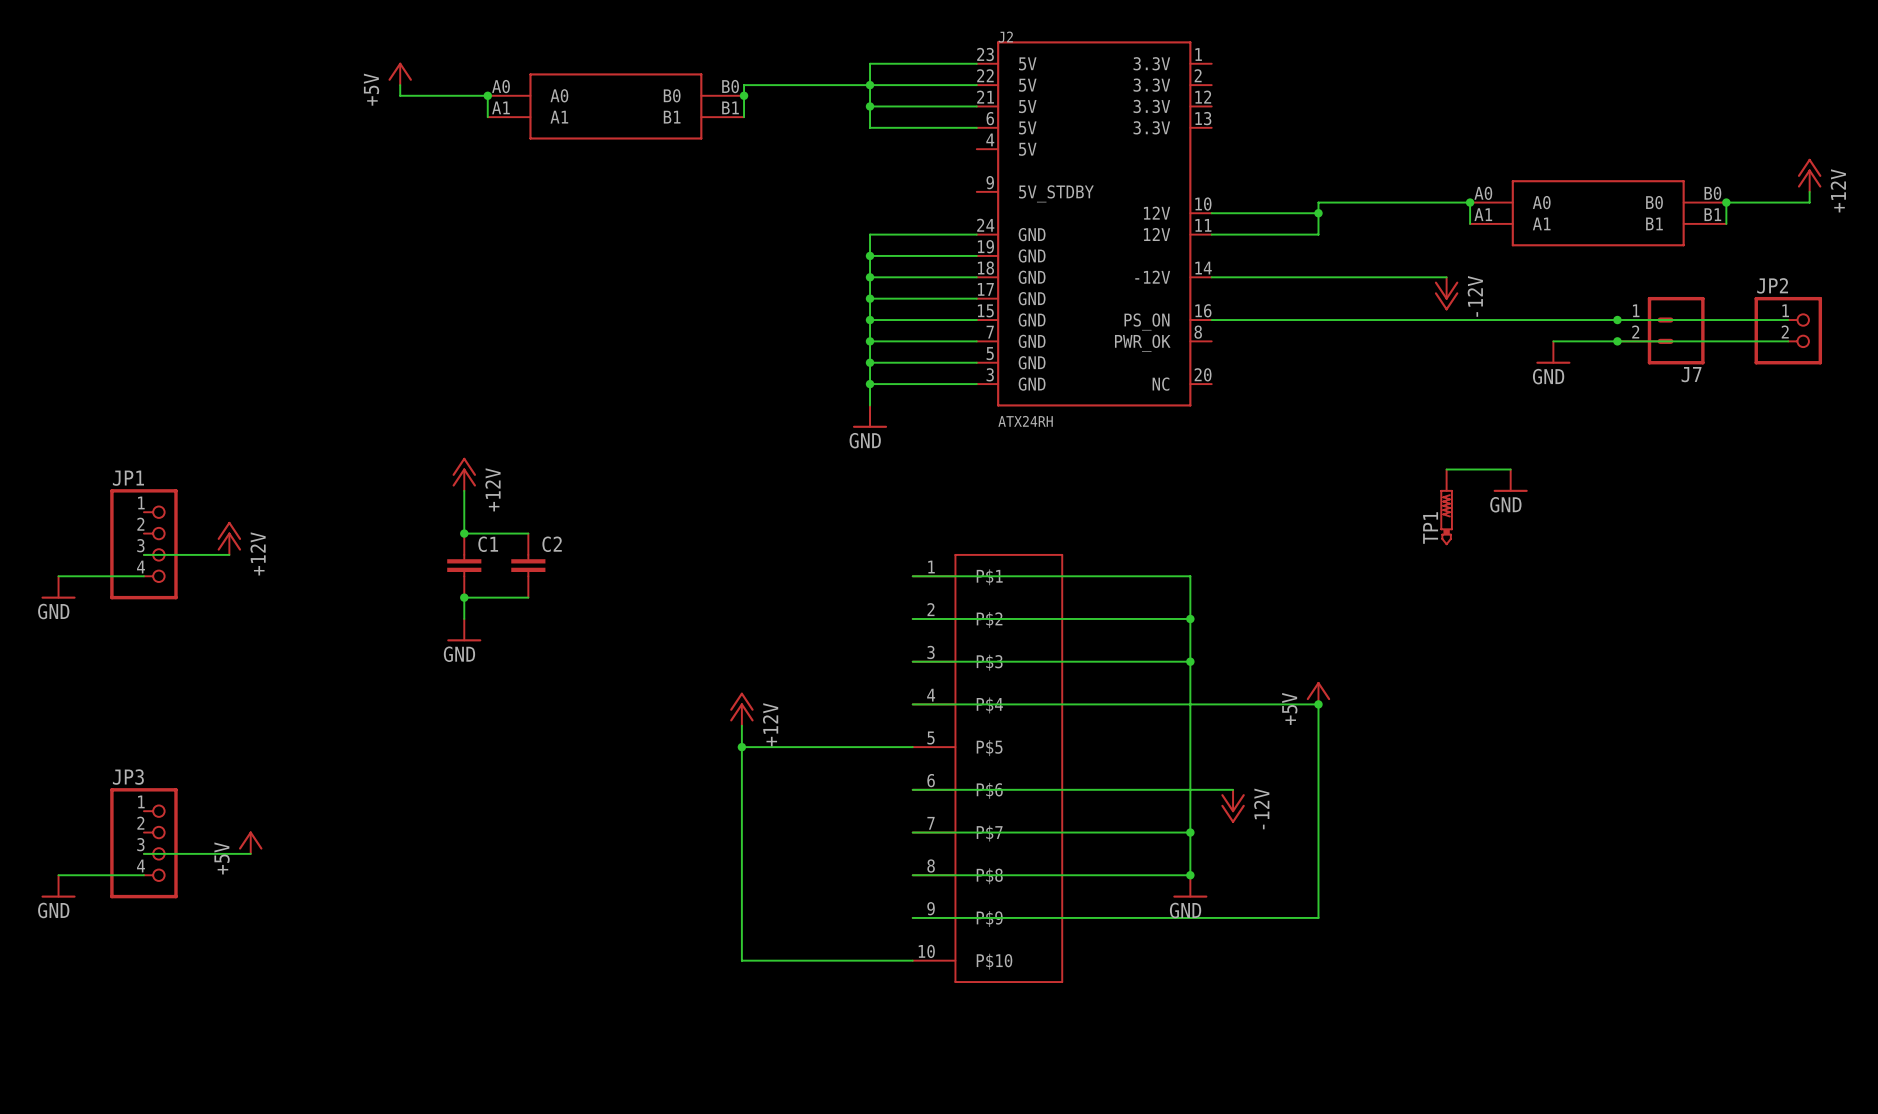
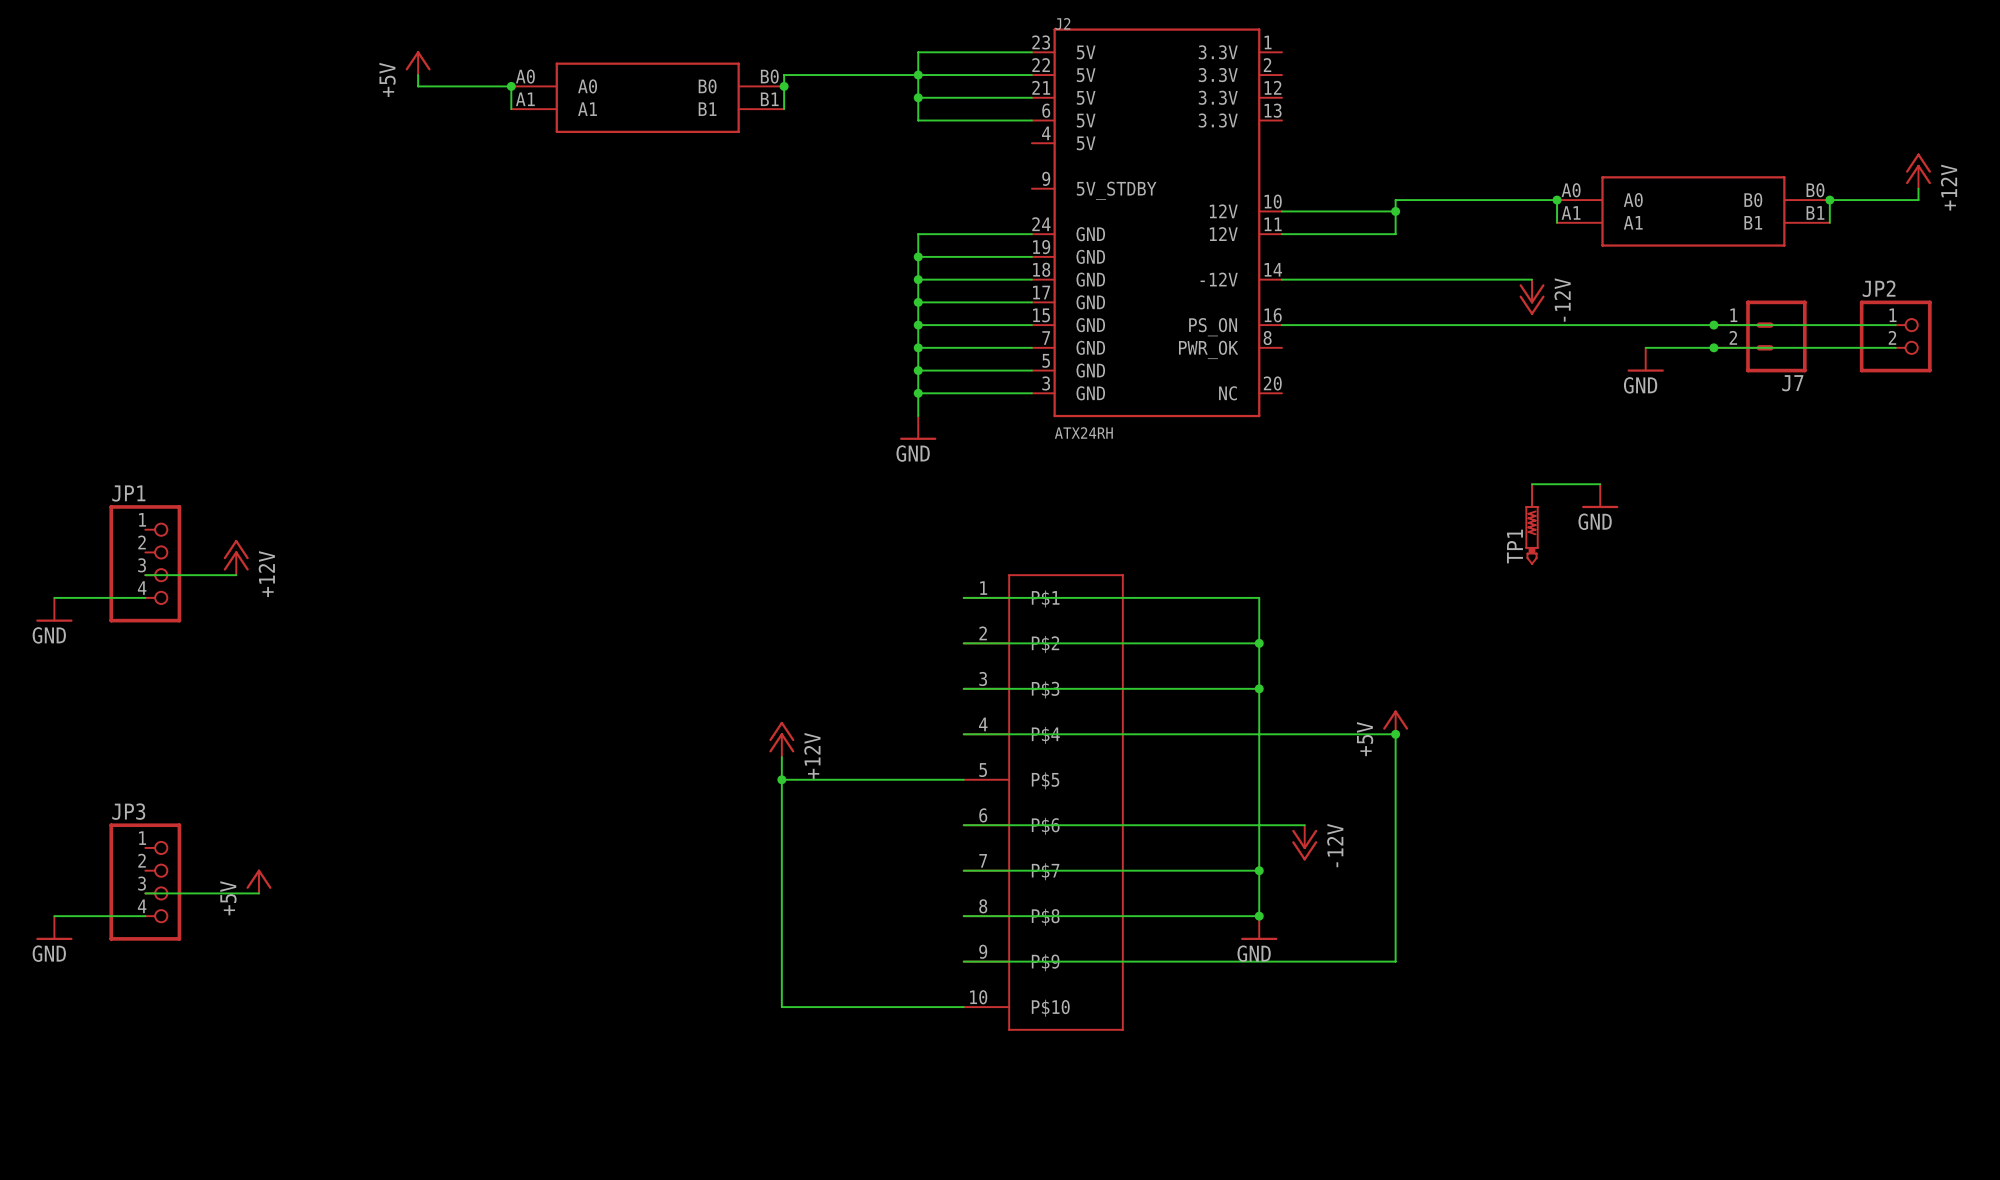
power symbol: +12V (464, 474) -> none
wire: (464, 490) (464, 533) (528, 533) -> none
junction: (464, 533) -> none
C1: (464, 565) -> none
C2: (528, 565) -> none
junction: (464, 597) -> none
wire: (528, 597) (464, 597) (464, 618) -> none
power symbol: GND (464, 630) -> none

